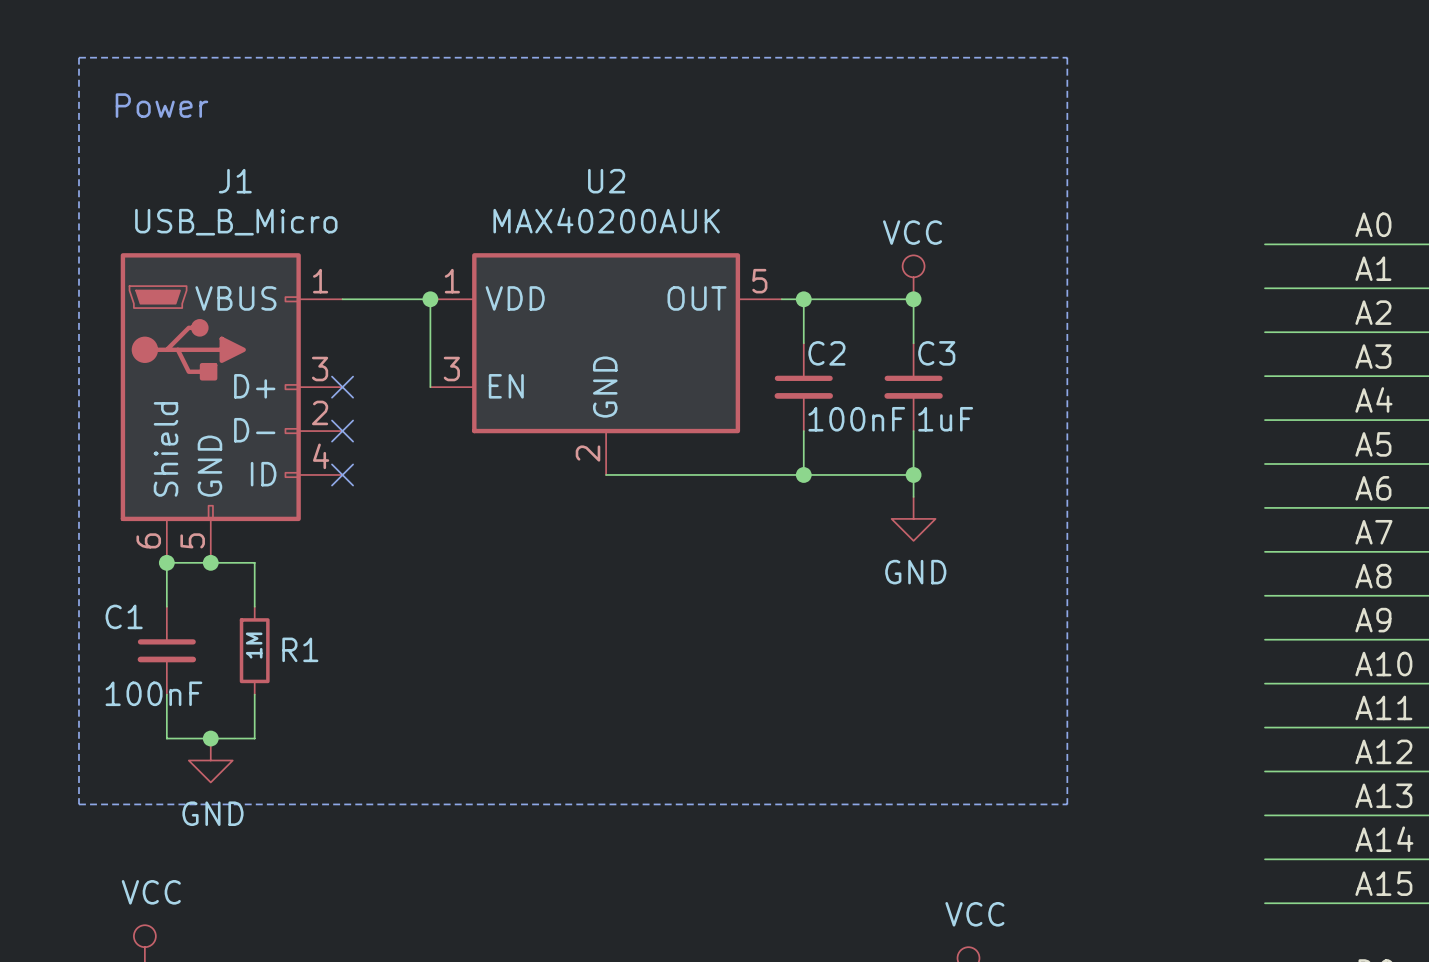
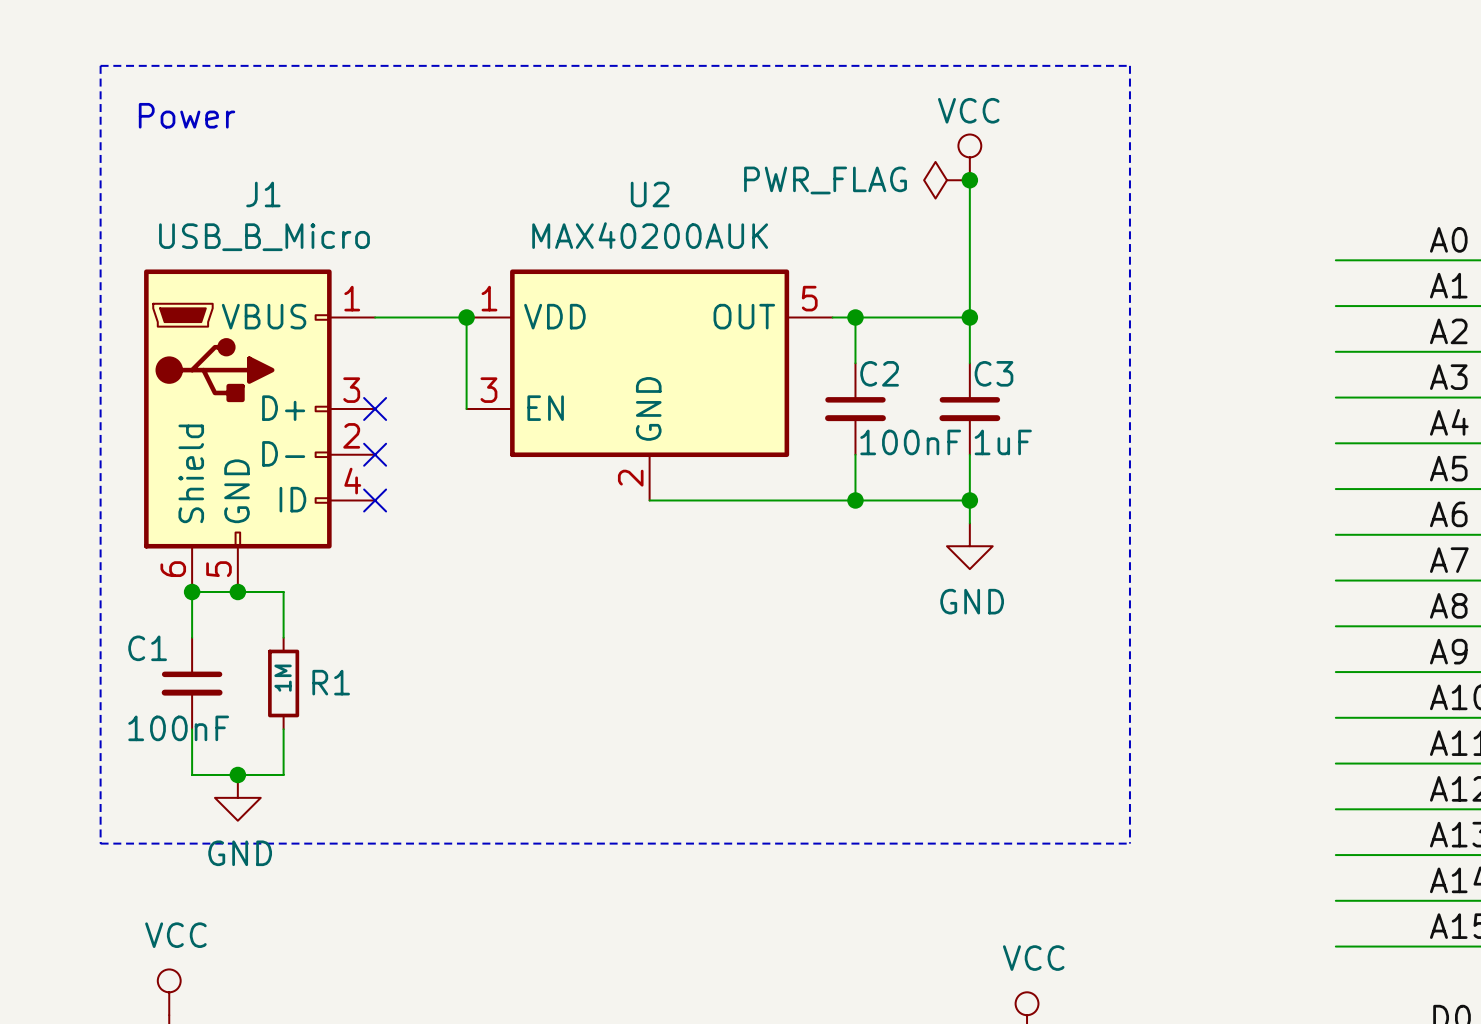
power symbol: none -> PWR_FLAG (946, 180)
wire: none -> (969, 180) (969, 317)
junction: none -> (969, 180)
power symbol position: VCC (913, 277) -> VCC (969, 157)

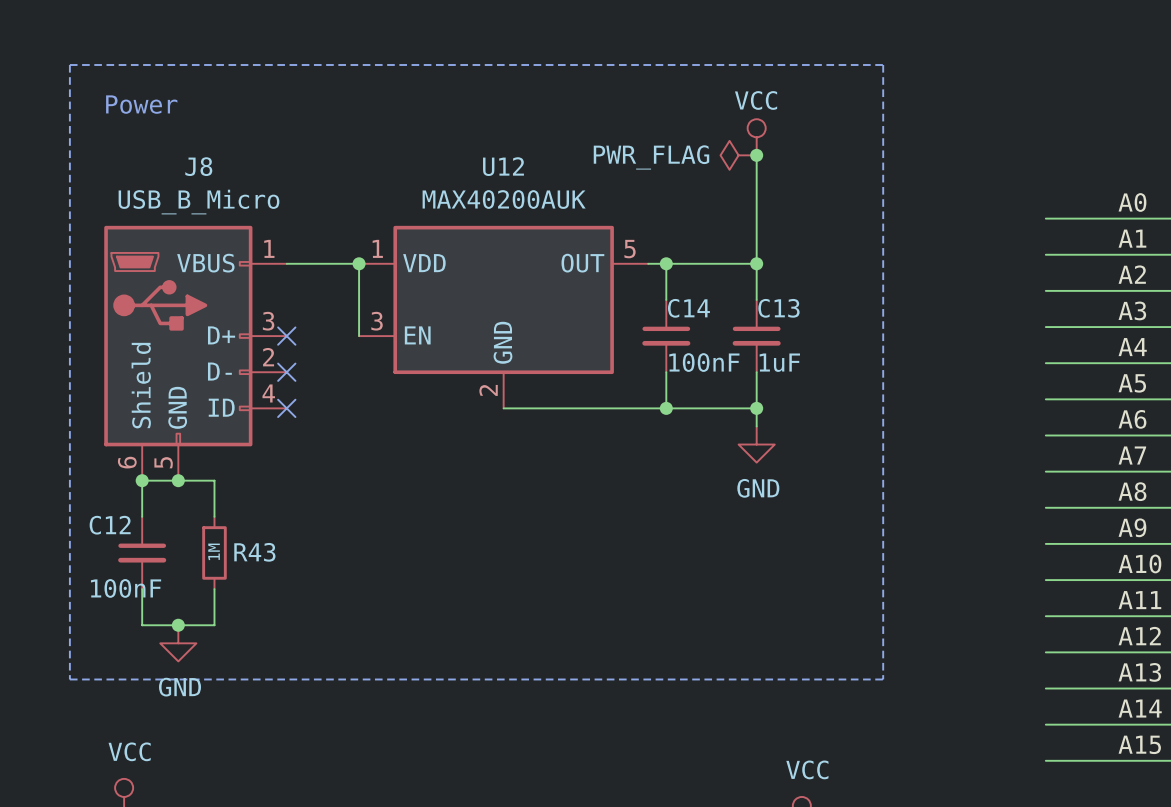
J1 name: J1 (263, 194) -> J8 (198, 166)
U2 name: U2 (650, 194) -> U12 (503, 166)
C2 name: C2 (879, 373) -> C14 (688, 308)
C3 name: C3 (993, 373) -> C13 (778, 308)
C1 name: C1 (147, 648) -> C12 (110, 525)
R1 name: R1 (331, 682) -> R43 (254, 552)

